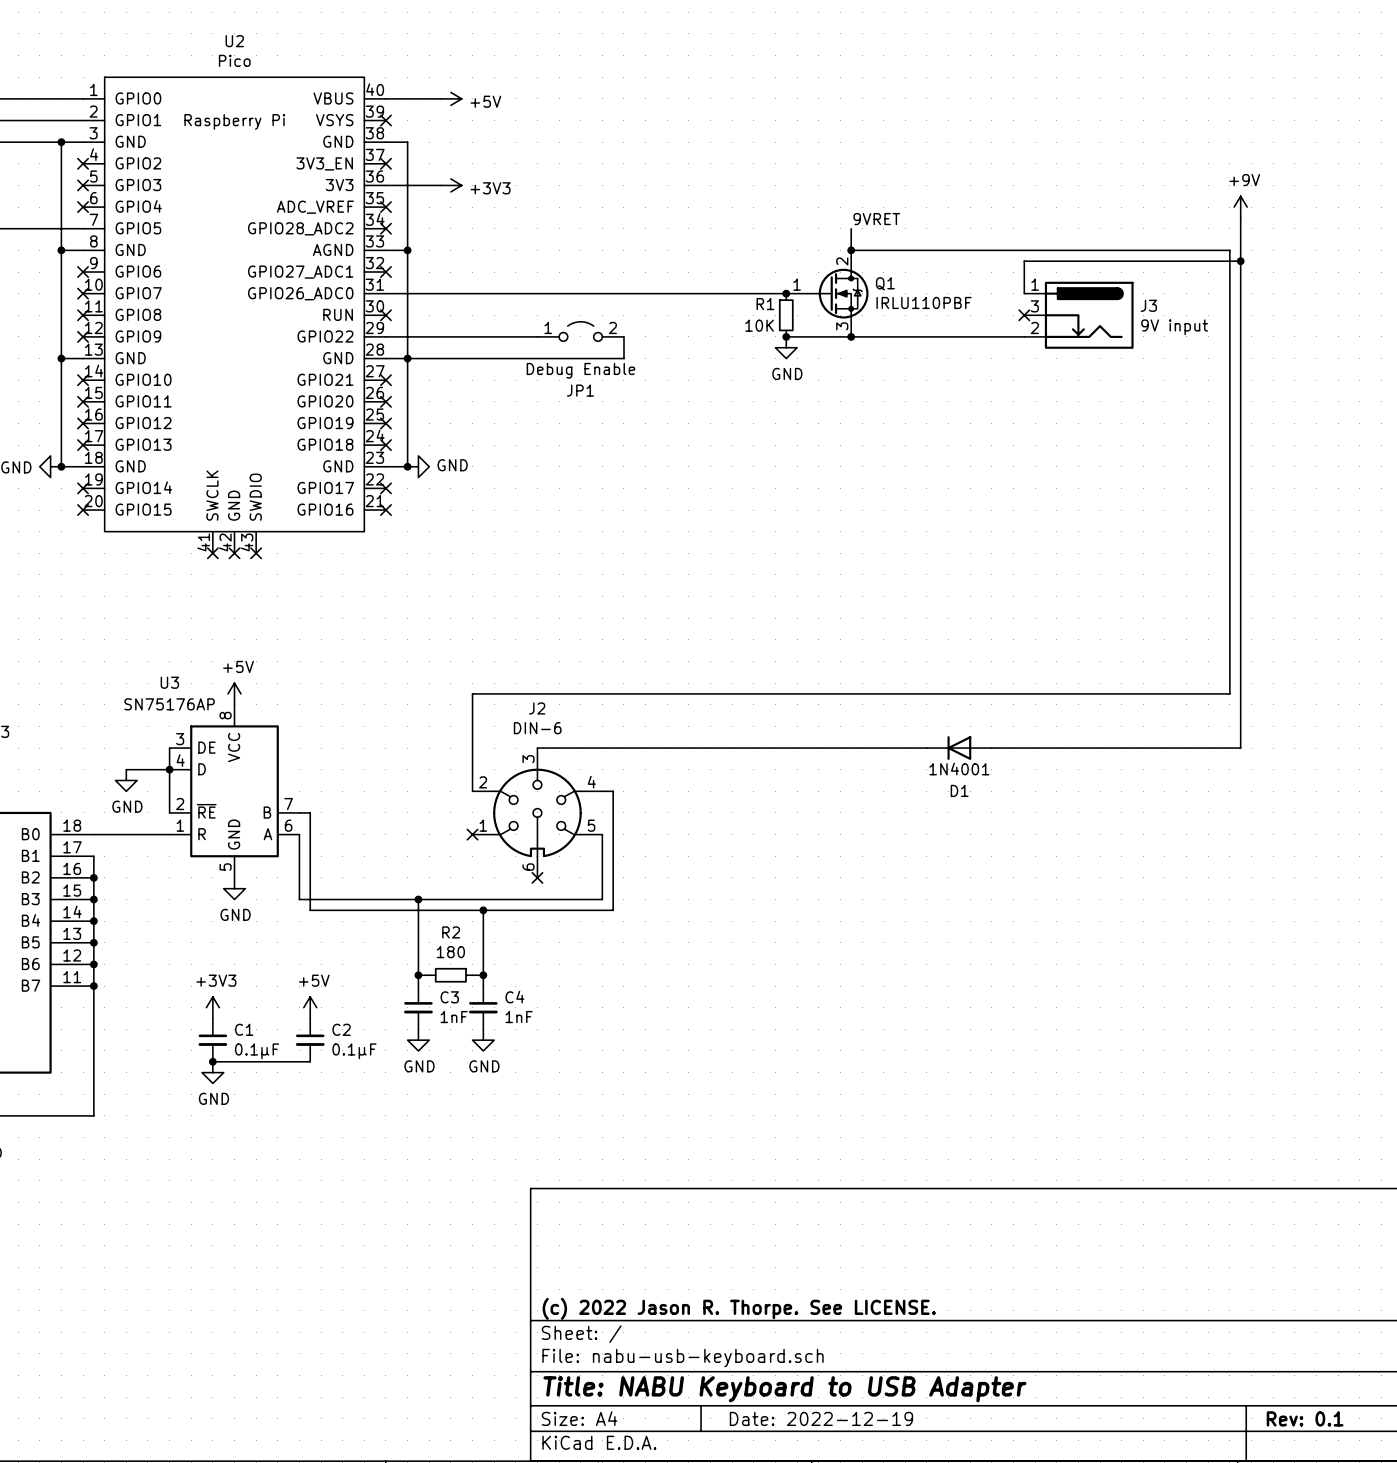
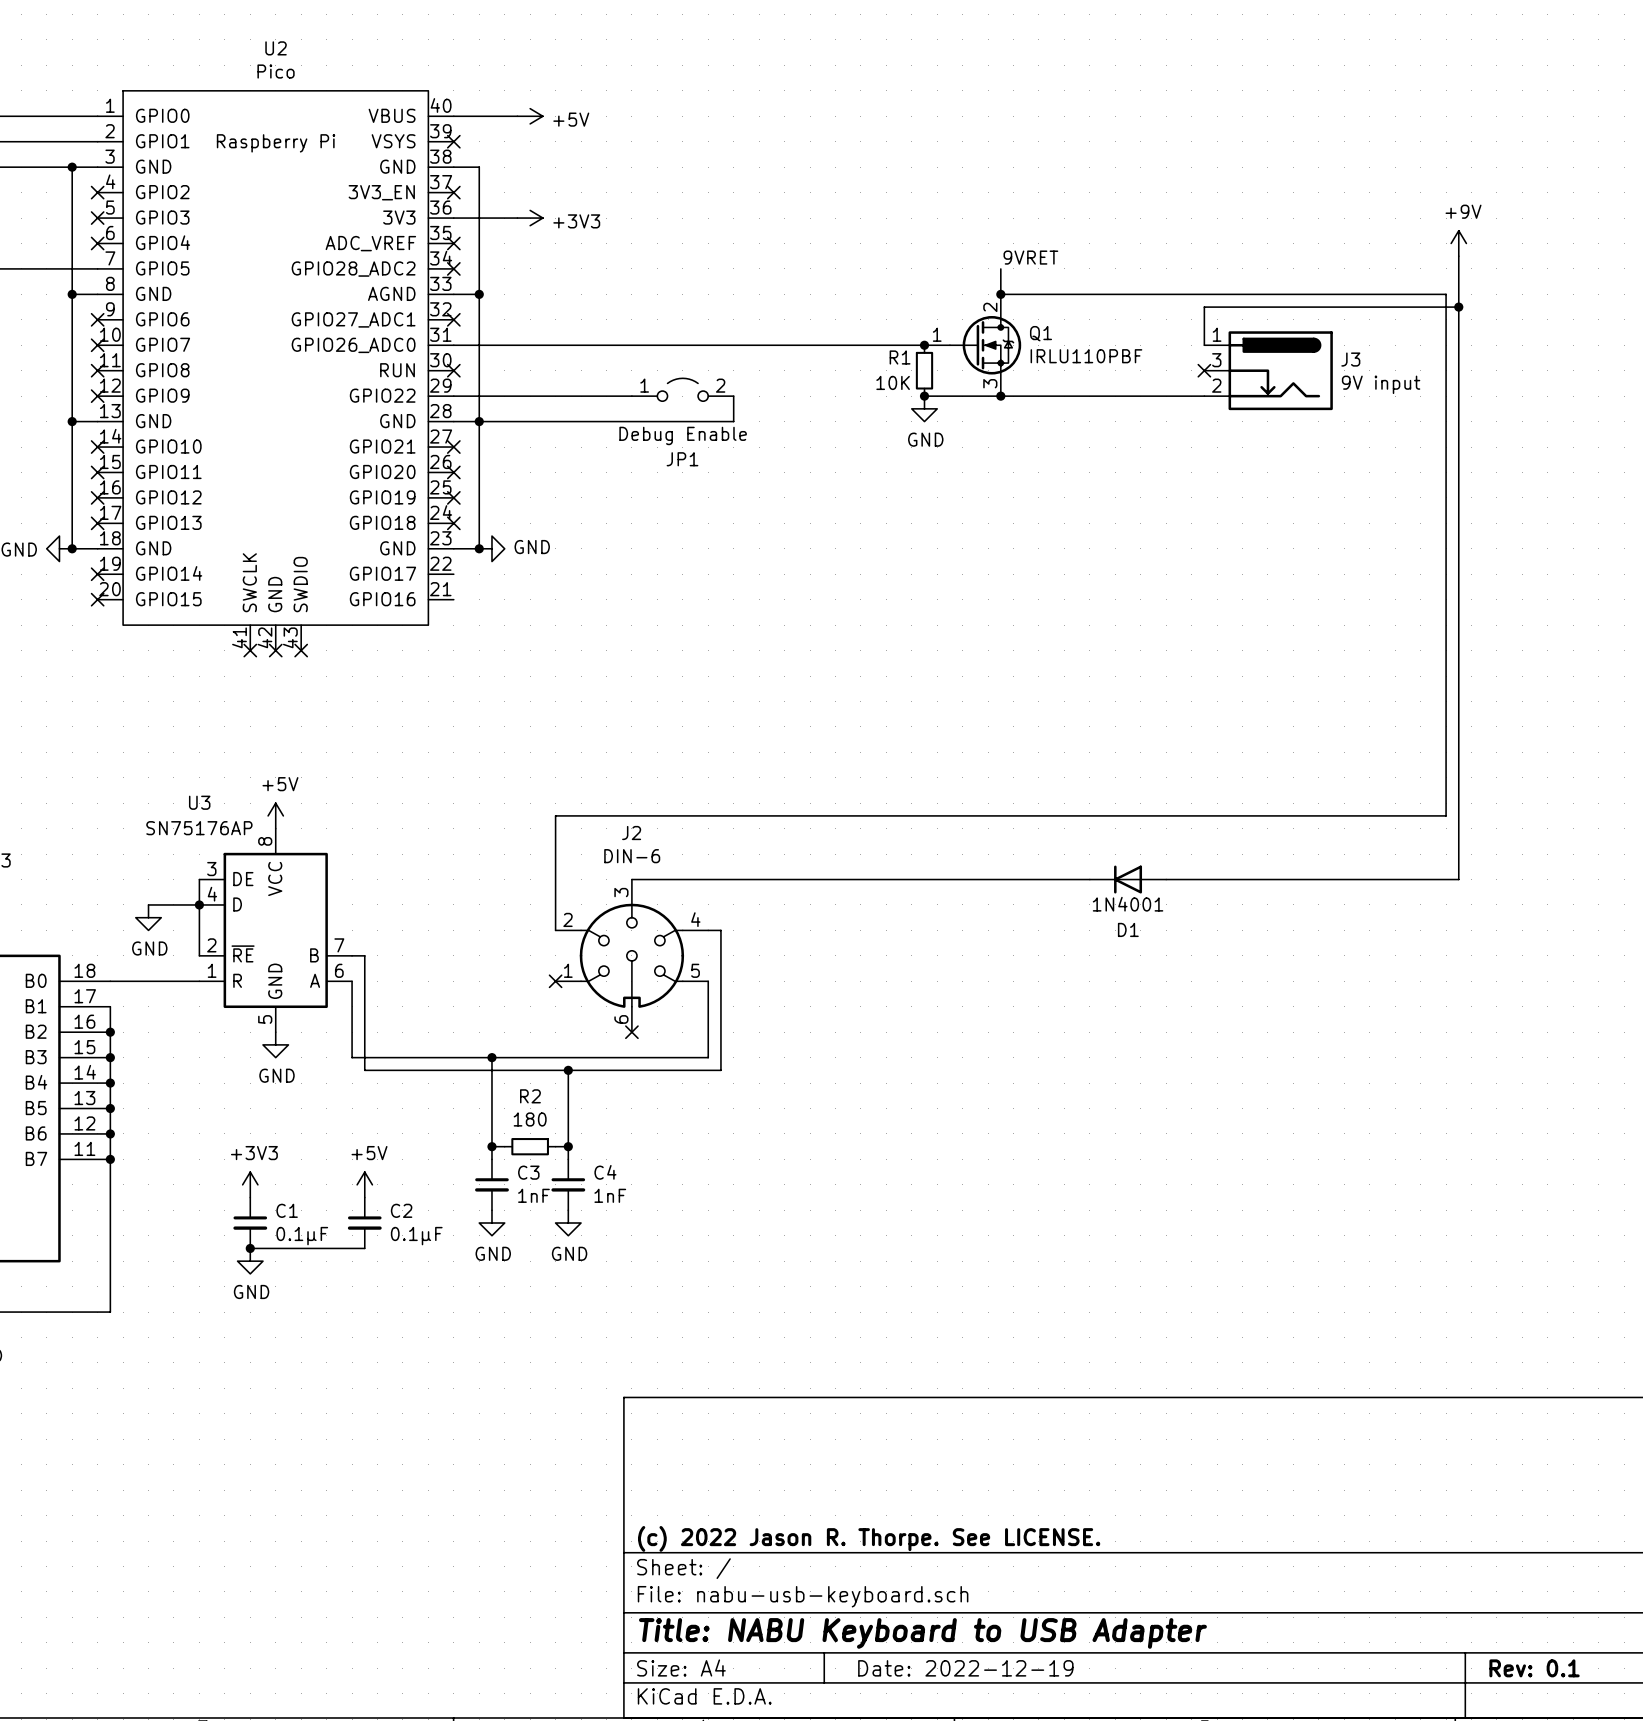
no-connect mark: (385, 488) -> none
no-connect mark: (385, 510) -> none

